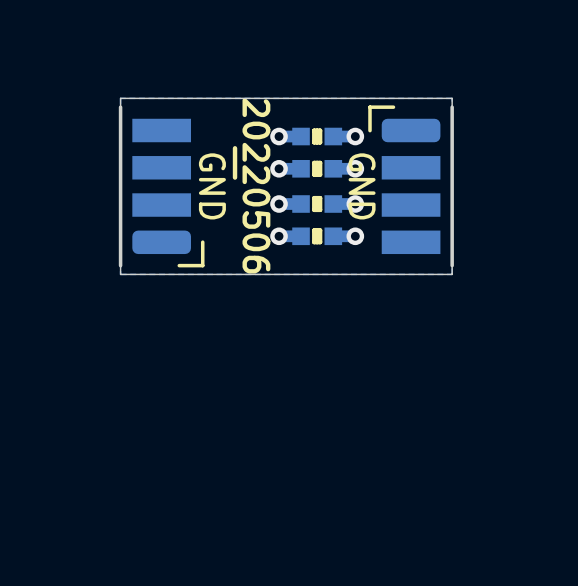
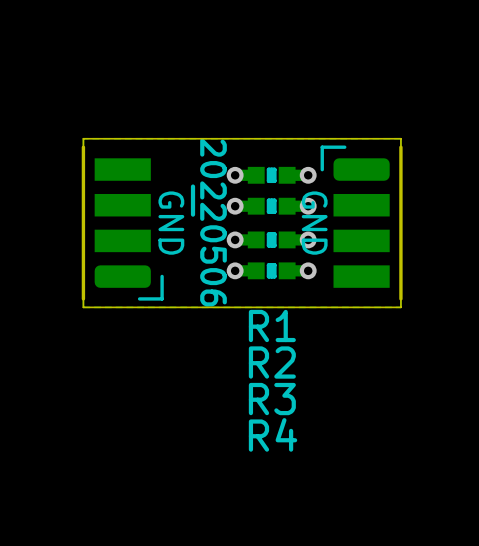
R1 name: none -> R1 (272, 325)
R2 name: none -> R2 (272, 362)
R3 name: none -> R3 (272, 399)
R4 name: none -> R4 (273, 434)

